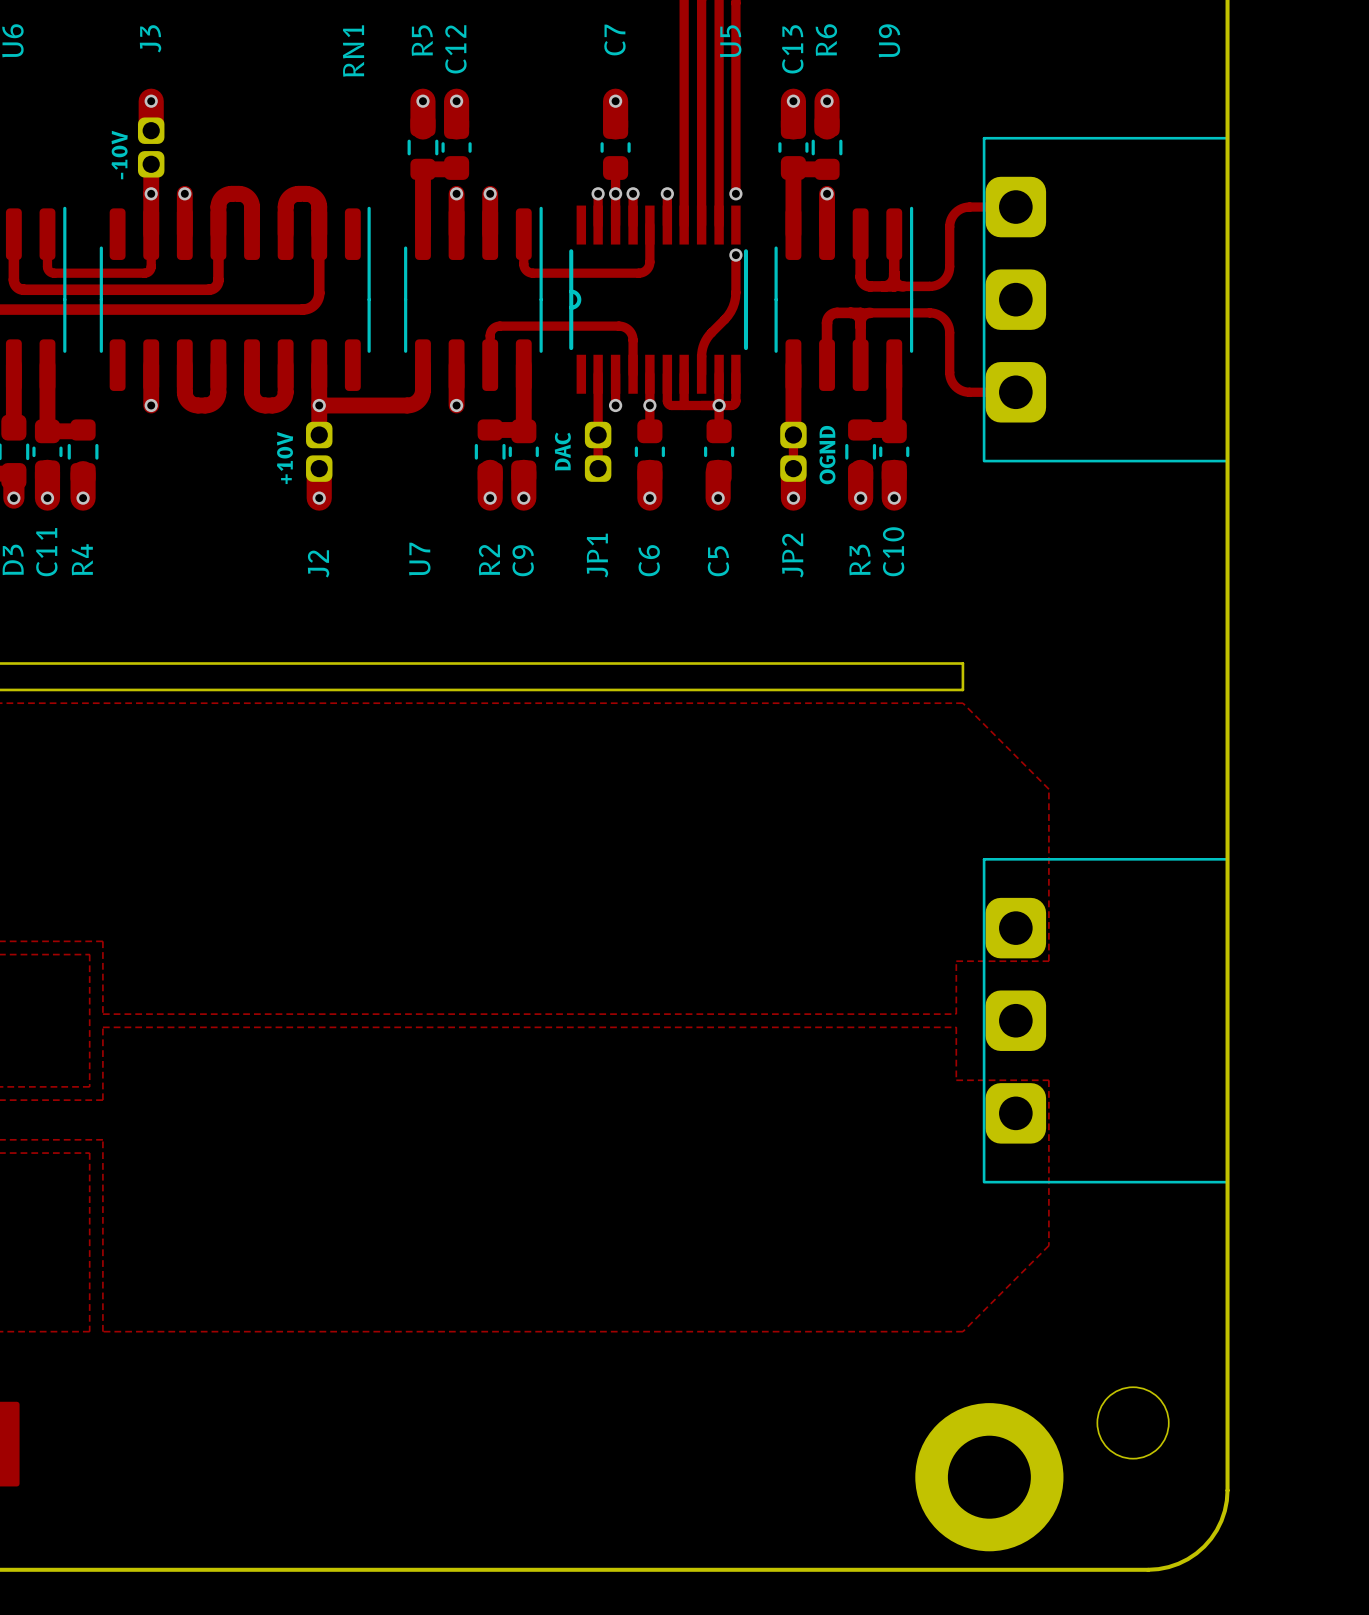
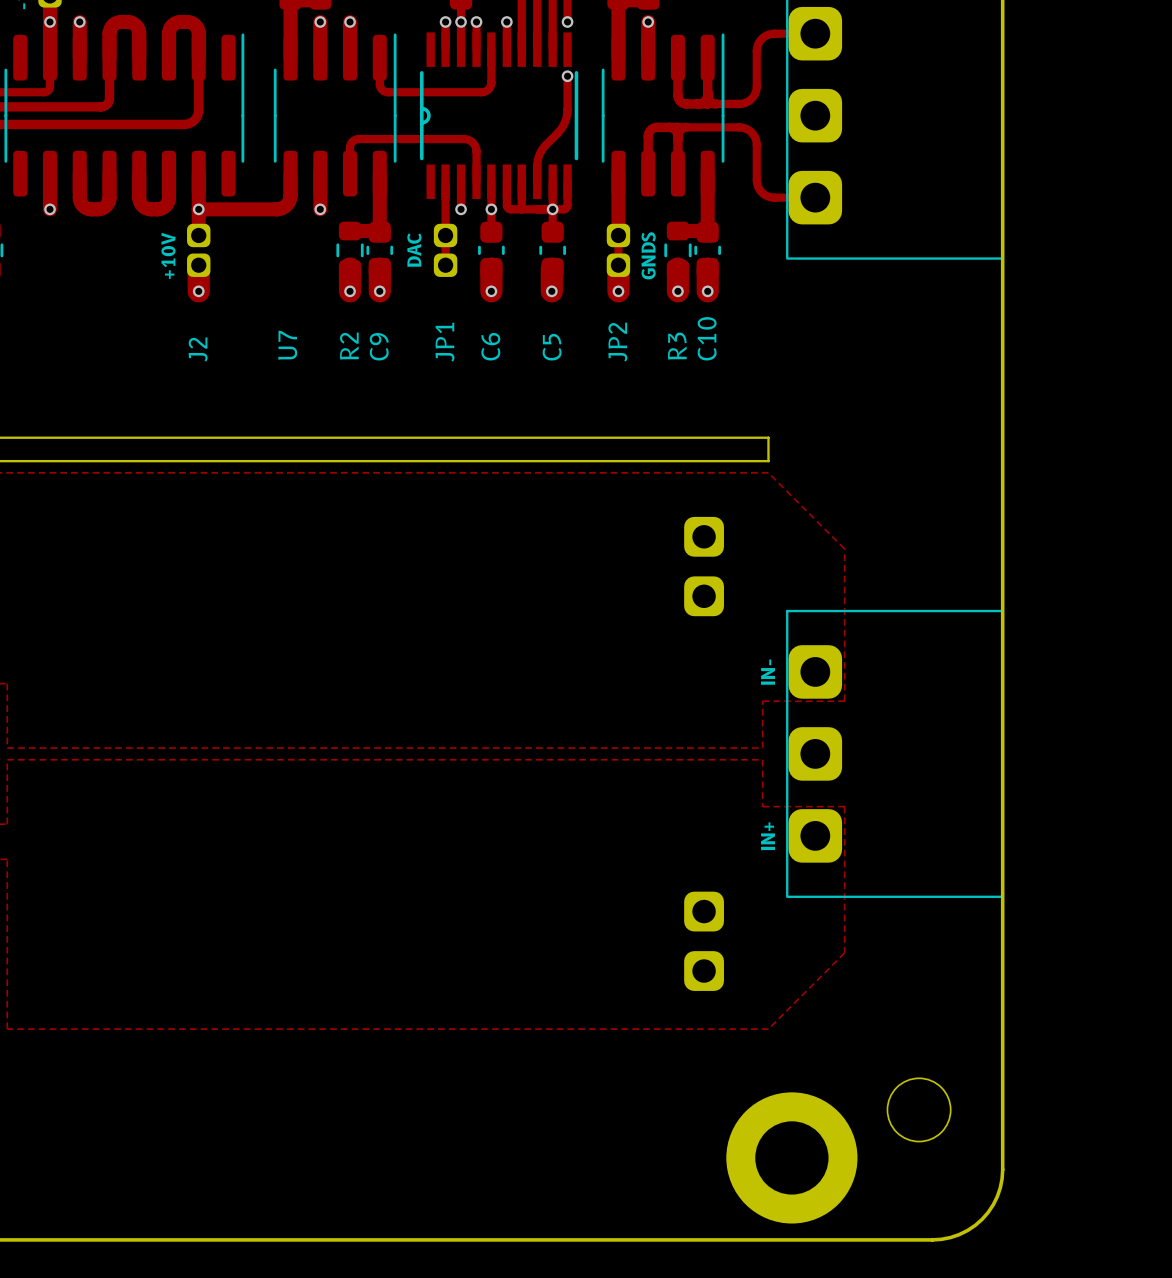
text: OGND (827, 455) -> GNDS (648, 255)
part: none -> (704, 566)
text: none -> IN- (767, 672)
text: none -> IN+ (767, 836)
part: none -> (704, 941)

